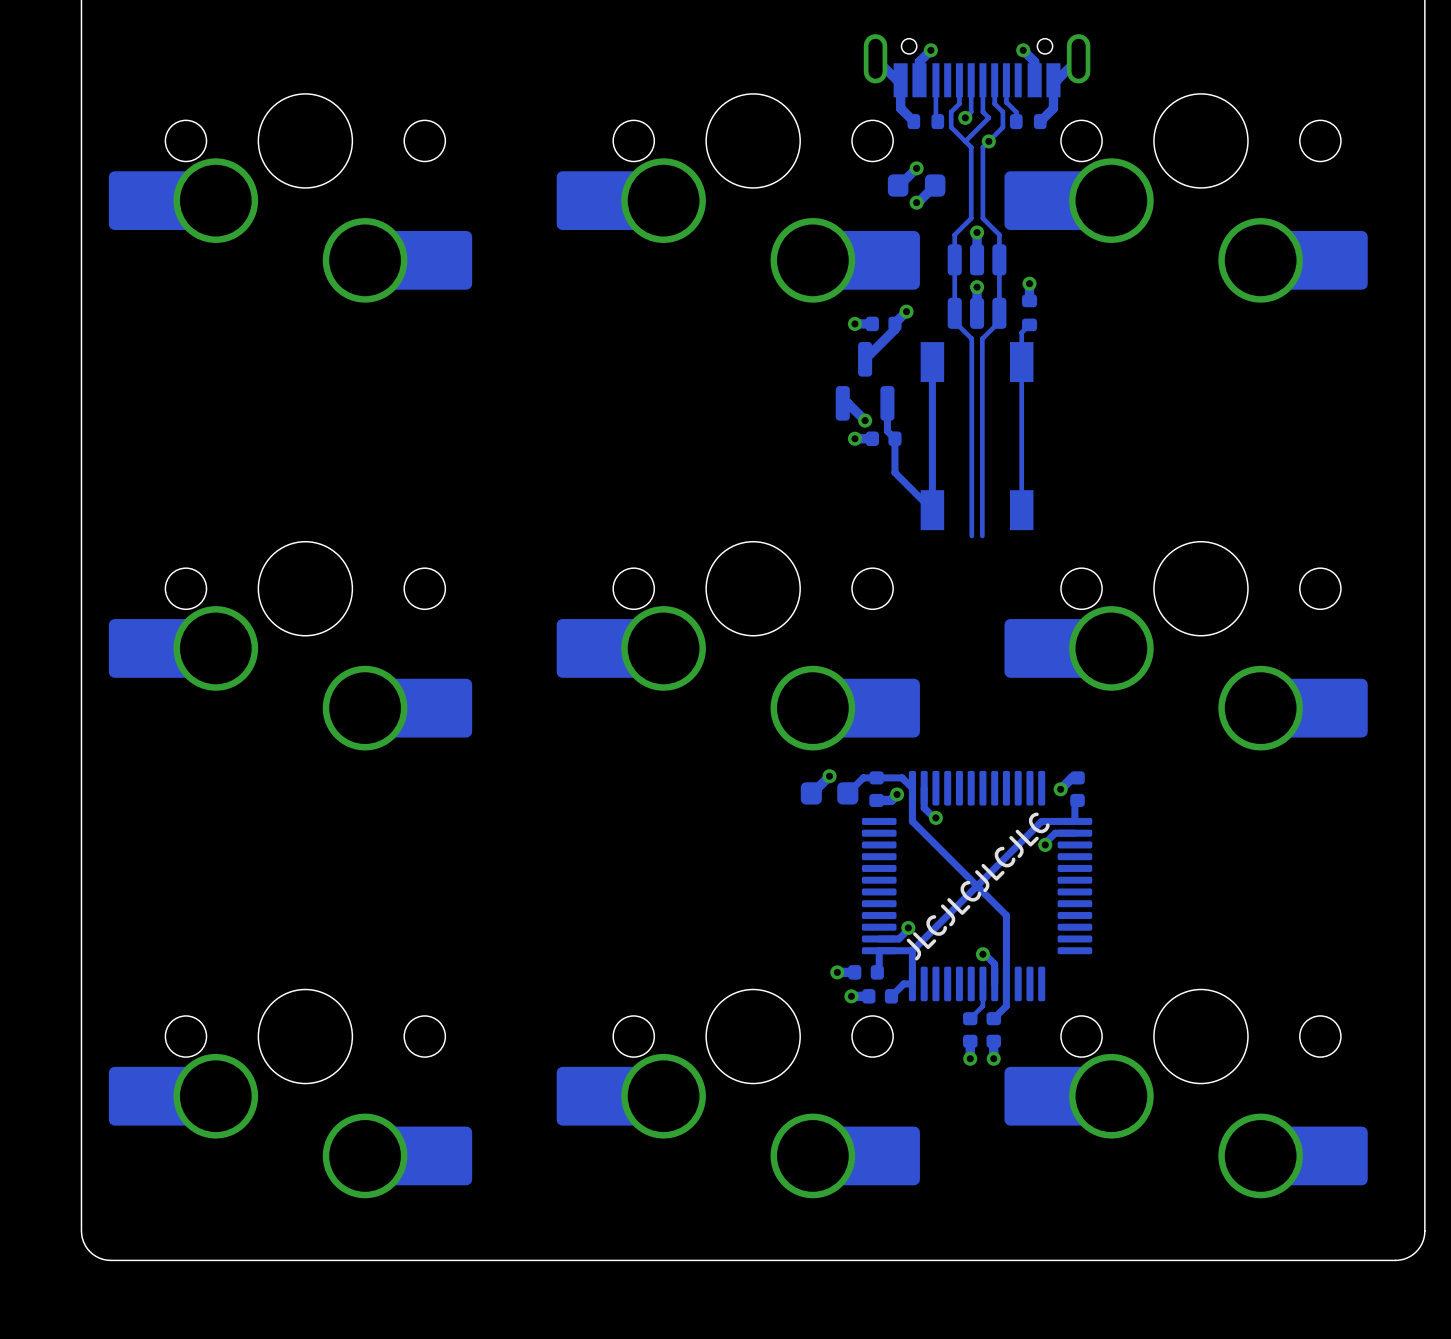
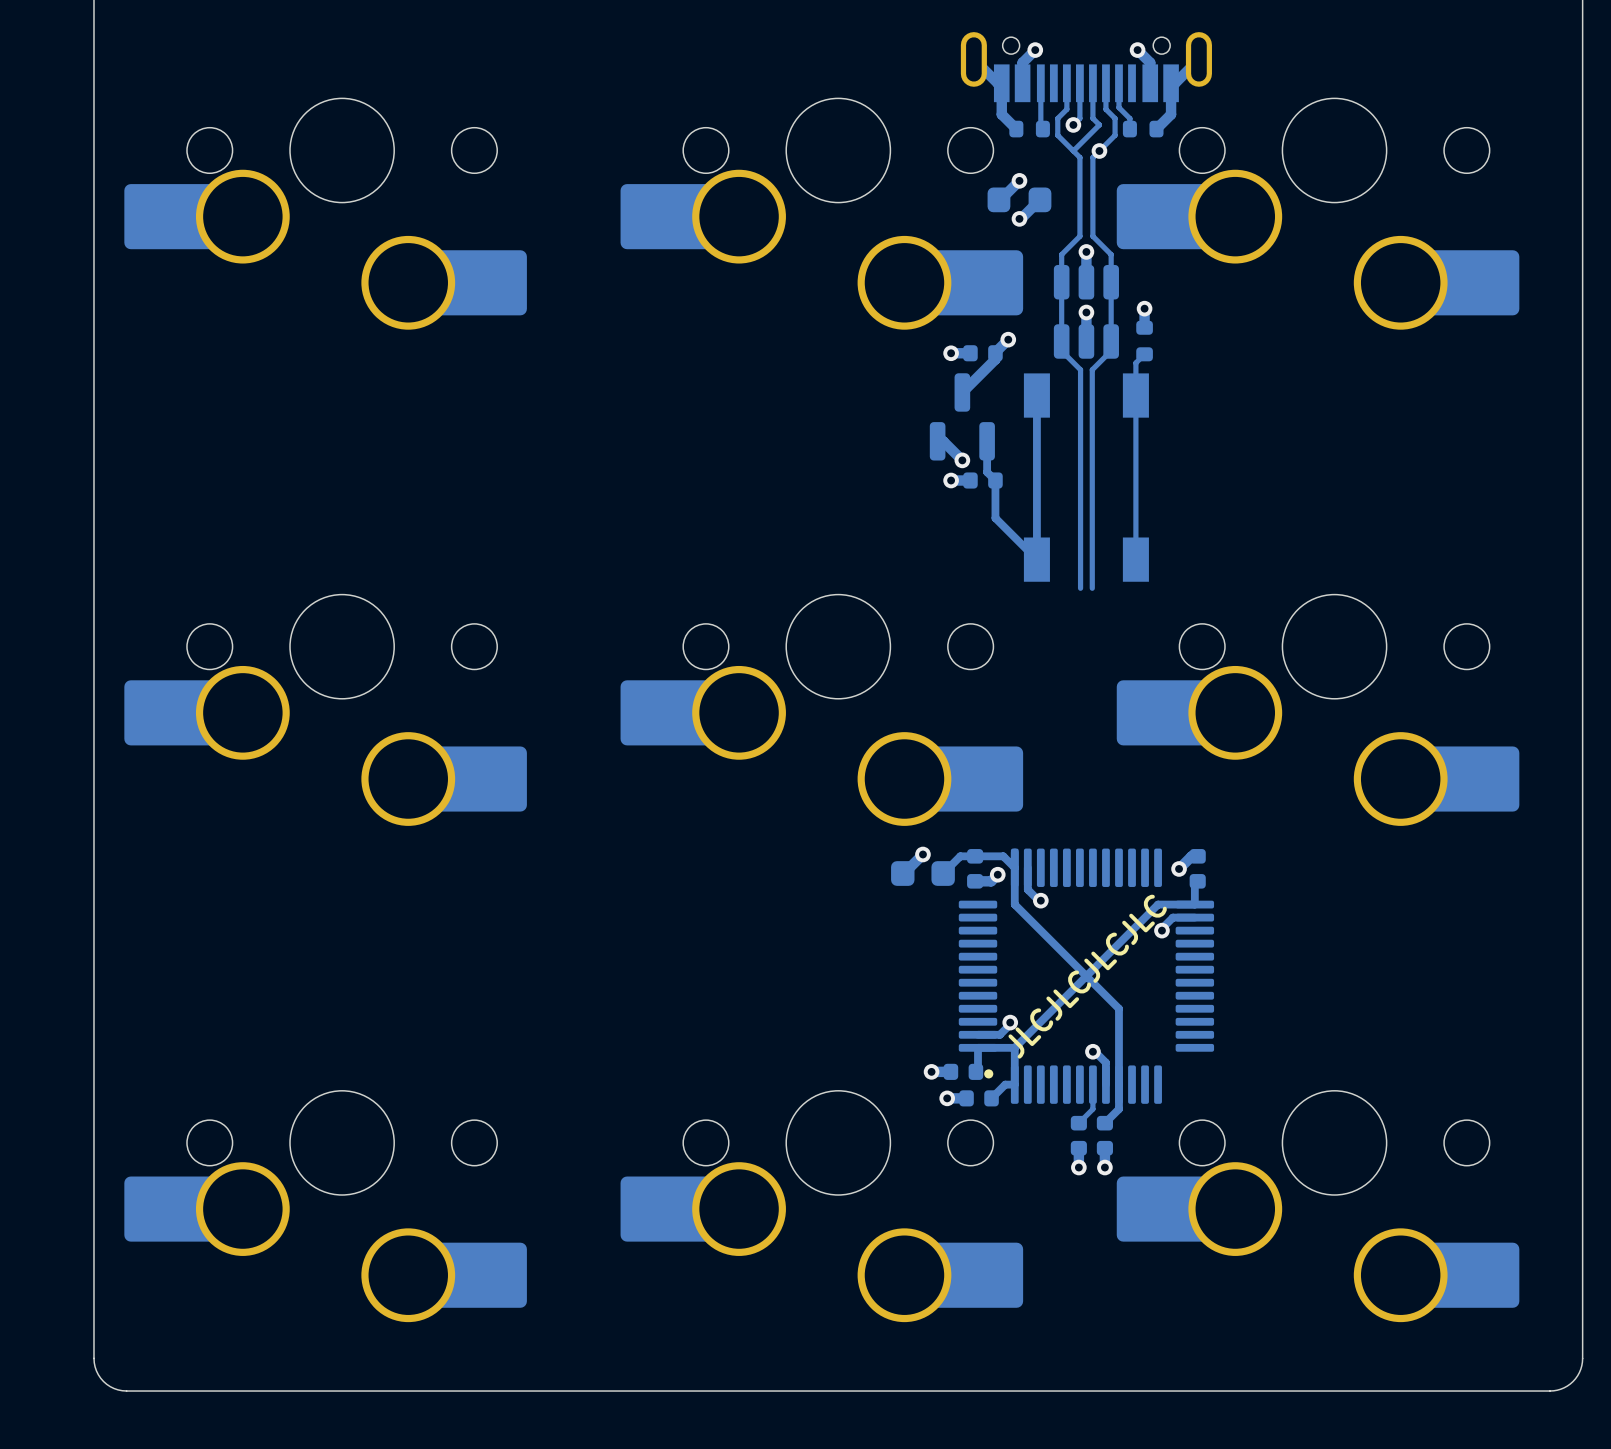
part footprint: [861, 770, 1093, 1002] -> [958, 848, 1215, 1104]

